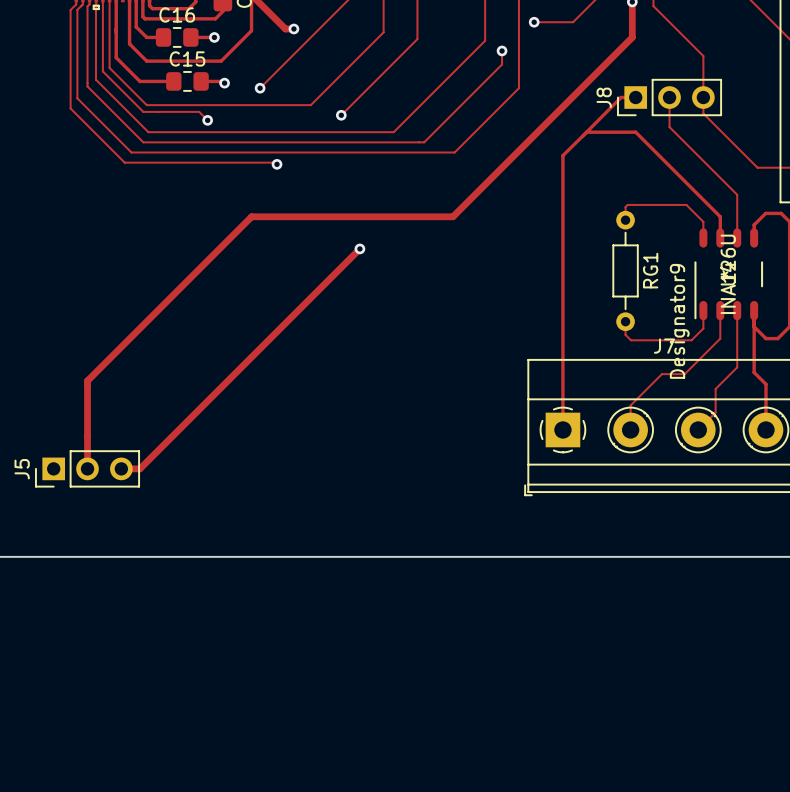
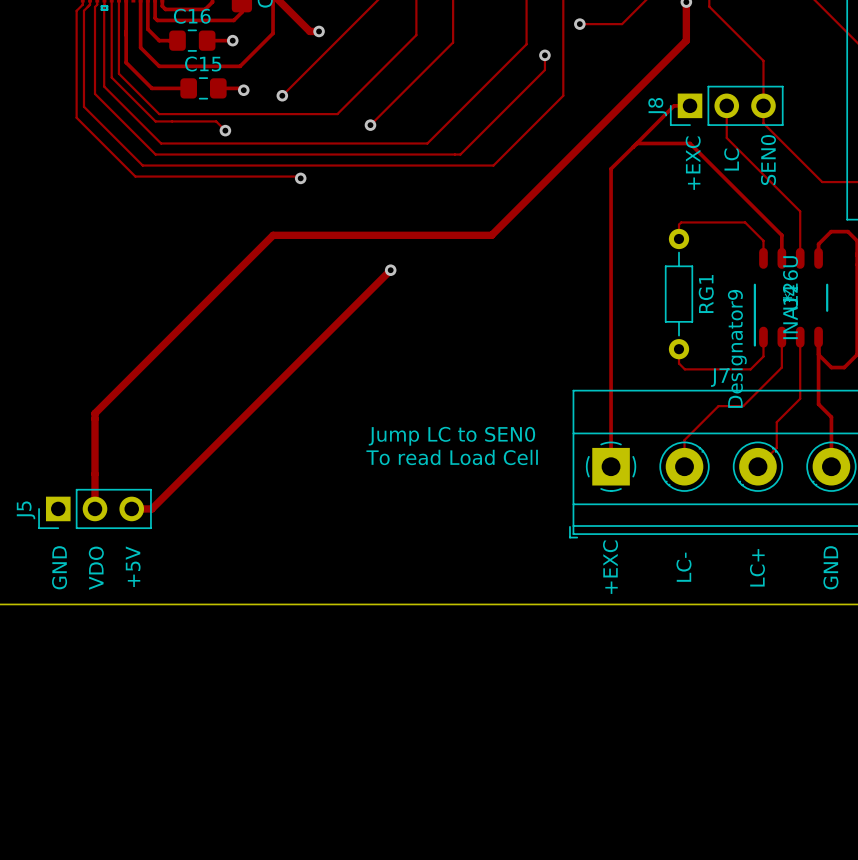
text: none -> LC (731, 159)
text: none -> SEN0 (768, 160)
text: none -> +EXC (693, 163)
text: none -> Jump LC to SEN0 (451, 436)
text: none -> To read Load Cell (452, 457)
text: none -> +5V (133, 566)
text: none -> +EXC (610, 567)
text: none -> GND (59, 567)
text: none -> VDO (96, 568)
text: none -> LC- (683, 567)
text: none -> LC+ (757, 567)
text: none -> GND (830, 567)

